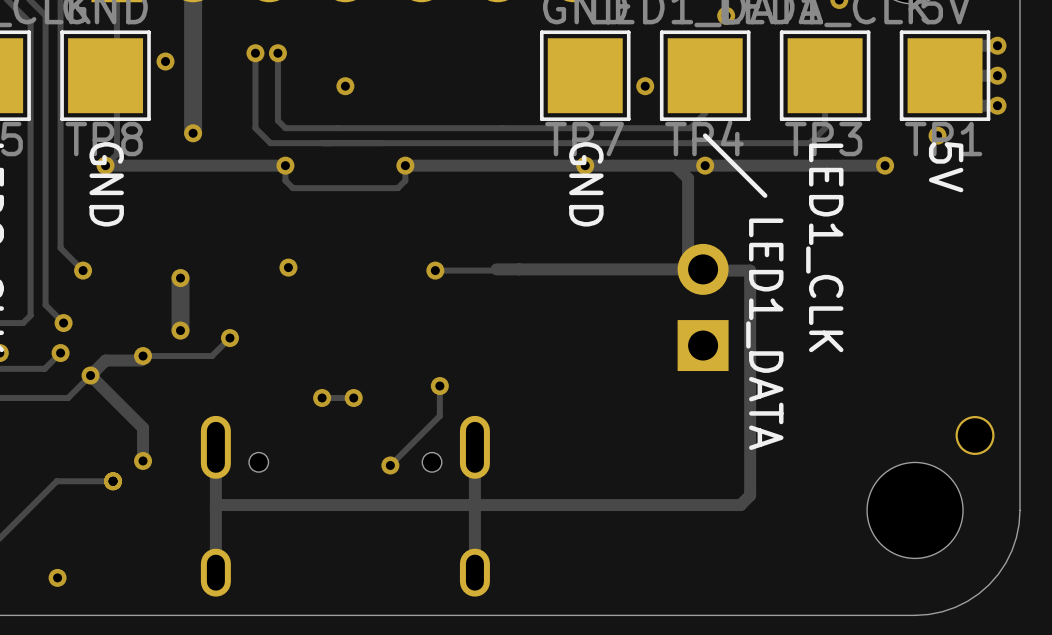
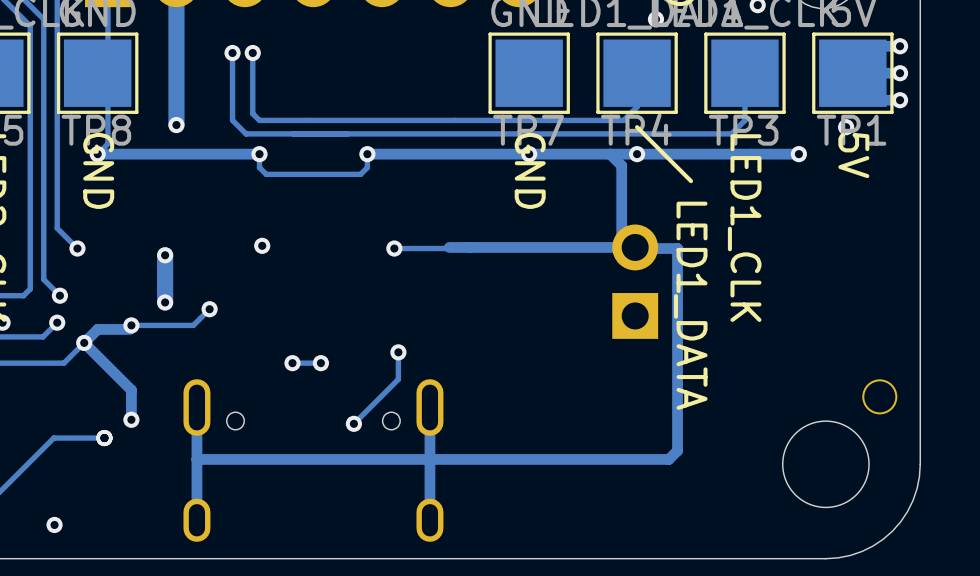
via: (165, 61) -> none
via: (345, 86) -> none
via: (645, 86) -> none

